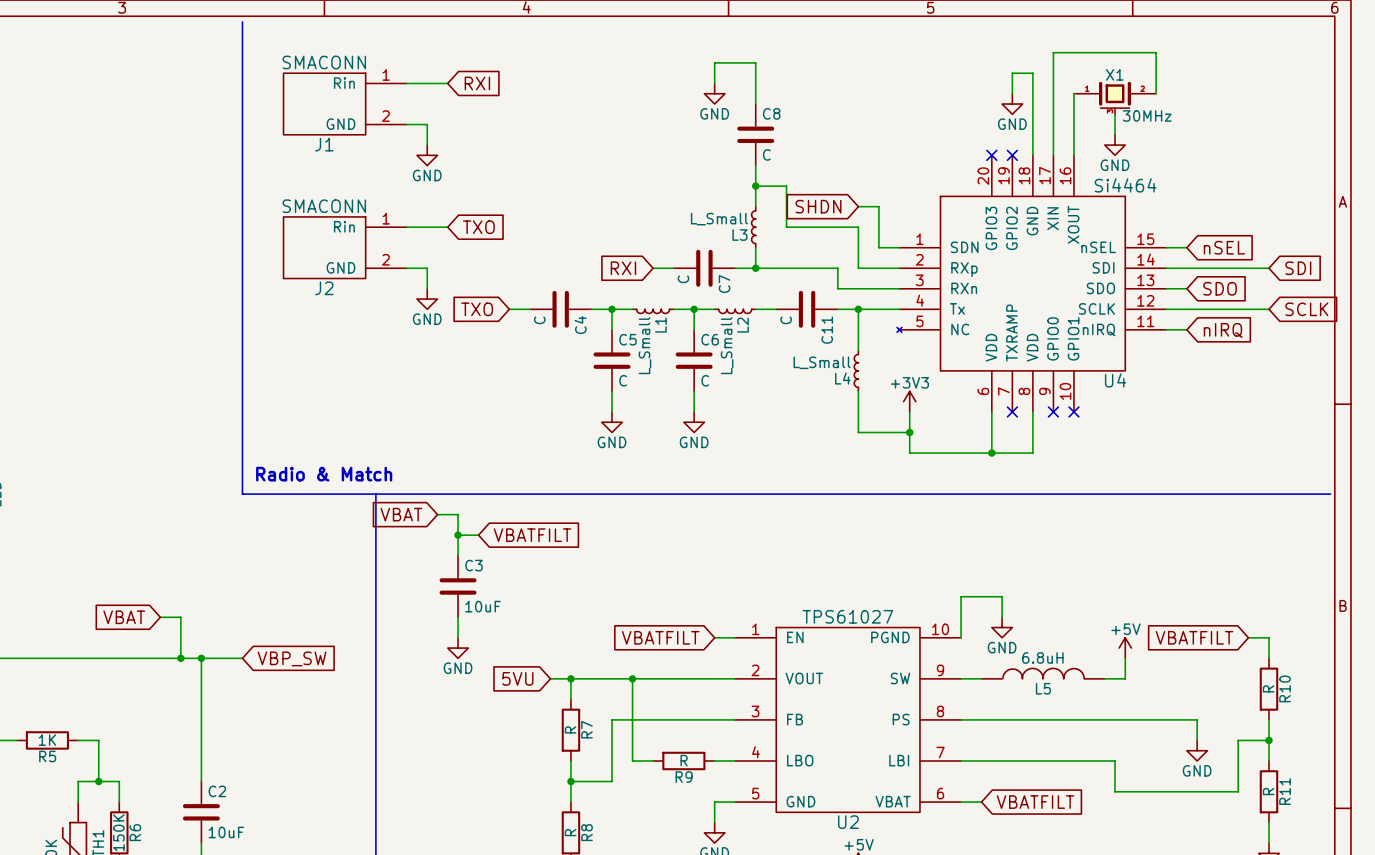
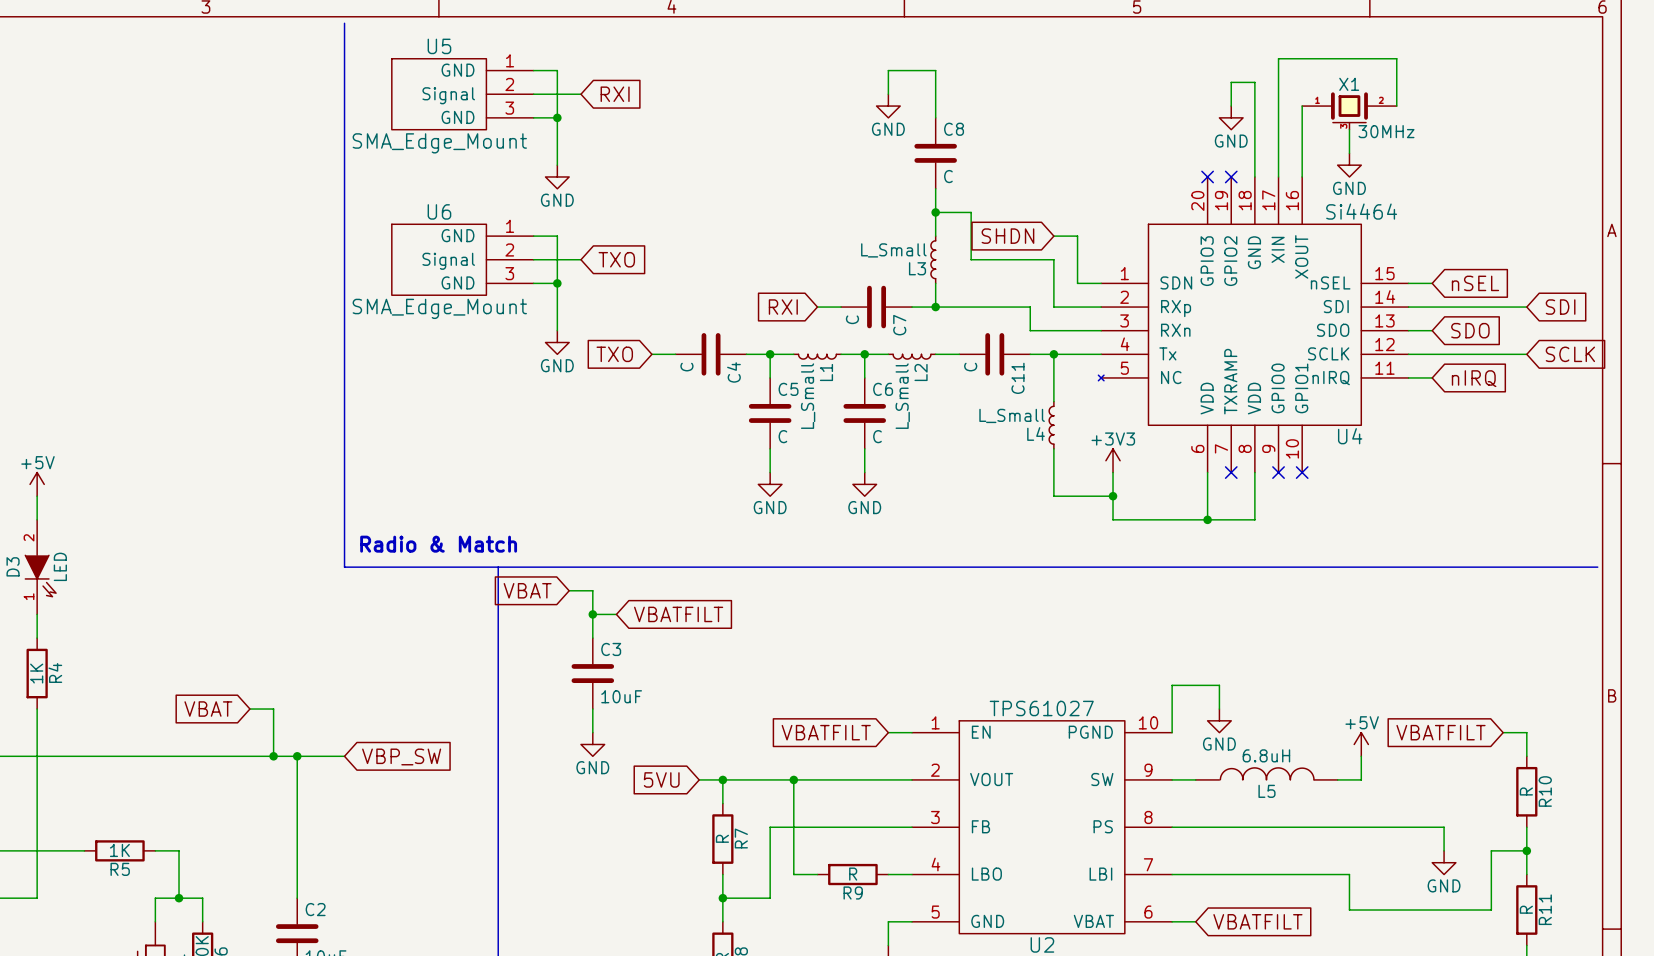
U5: none -> SMA_Edge_Mount (462, 94)
J1: SMACONN (345, 104) -> none
wire: none -> (533, 117) (557, 117)
junction: none -> (557, 117)
wire: (406, 124) (427, 124) -> (533, 70) (557, 70) (557, 141)
U6: none -> SMA_Edge_Mount (462, 259)
J2: SMACONN (345, 247) -> none
wire: none -> (533, 283) (557, 283)
junction: none -> (557, 283)
wire: (406, 268) (427, 268) -> (533, 236) (557, 236) (557, 307)

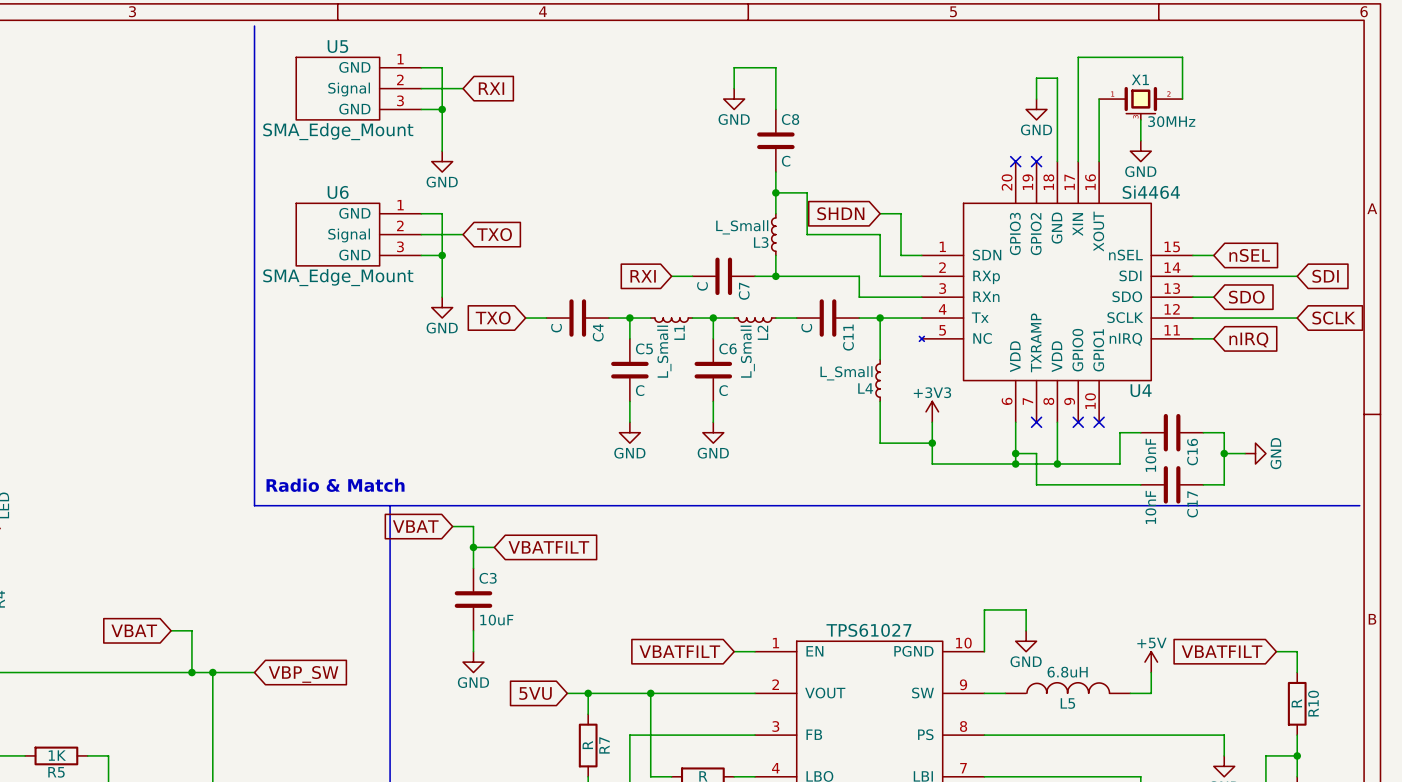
wire: none -> (1140, 432) (1119, 432) (1119, 463) (1057, 463)
C16: none -> 10nF (1172, 432)
wire: none -> (1203, 432) (1224, 432) (1224, 484) (1203, 484)
wire: none -> (1015, 453) (1036, 453) (1036, 484) (1140, 484)
junction: none -> (1015, 453)
wire: none -> (1224, 453) (1245, 453)
junction: none -> (1224, 453)
power symbol: none -> GND (1255, 453)
junction: none -> (1057, 463)
C17: none -> 10nF (1172, 484)

